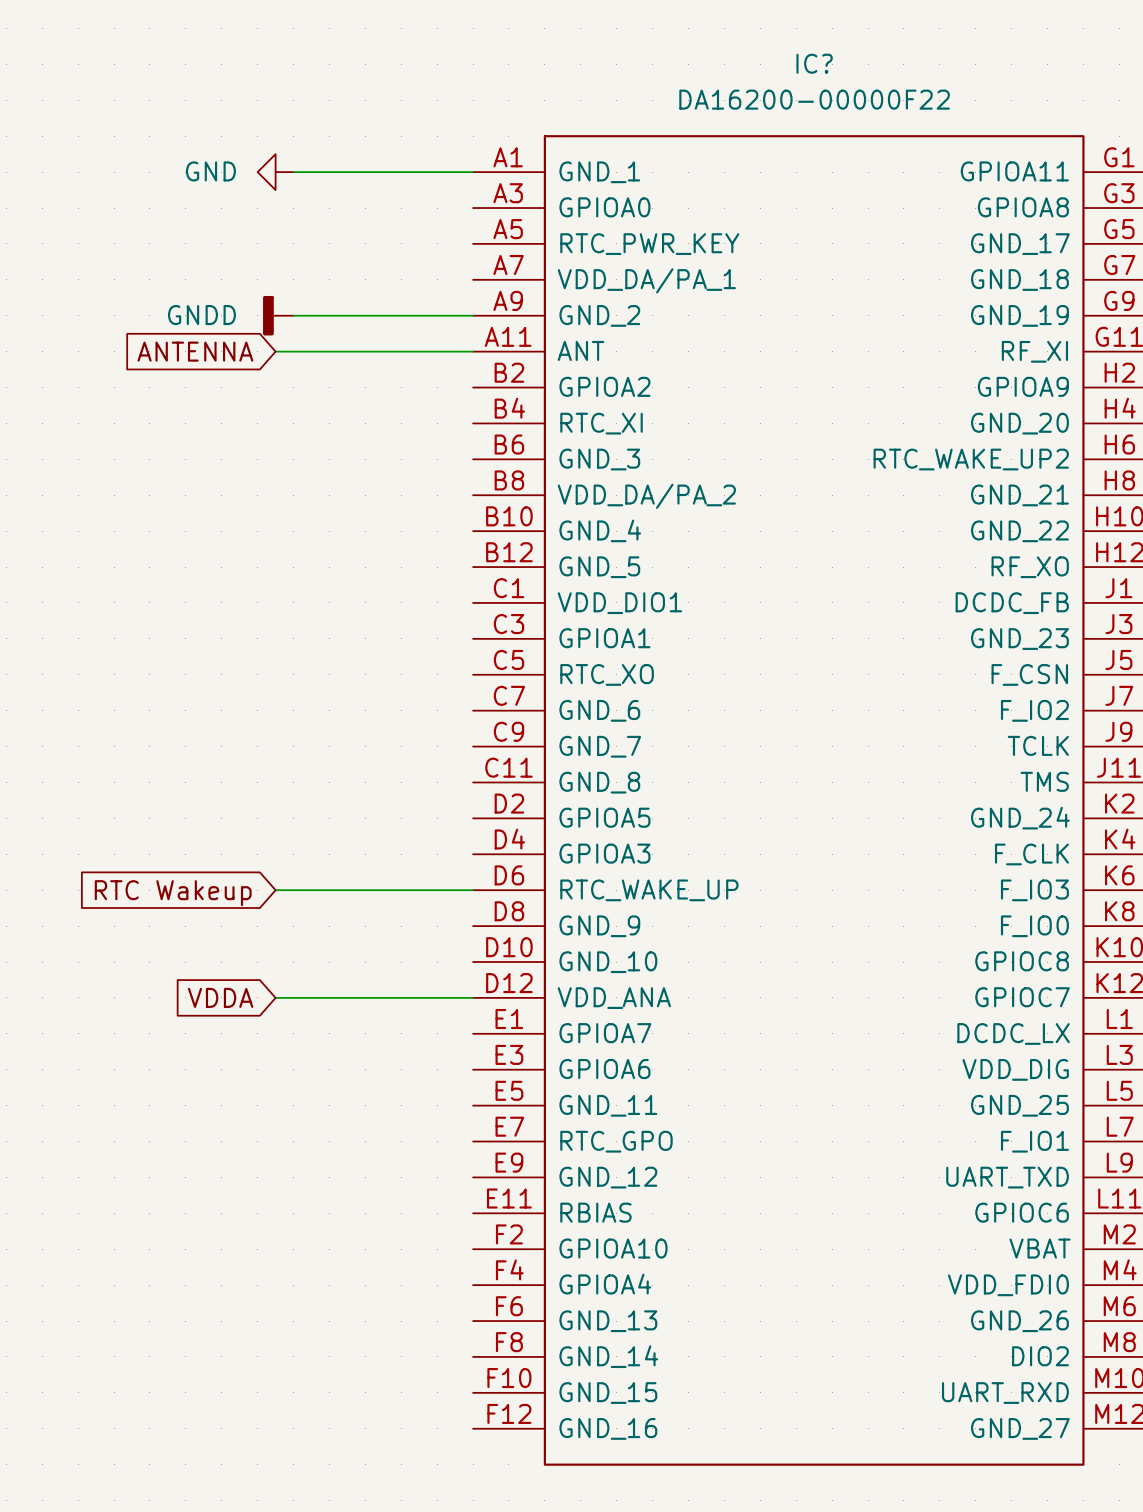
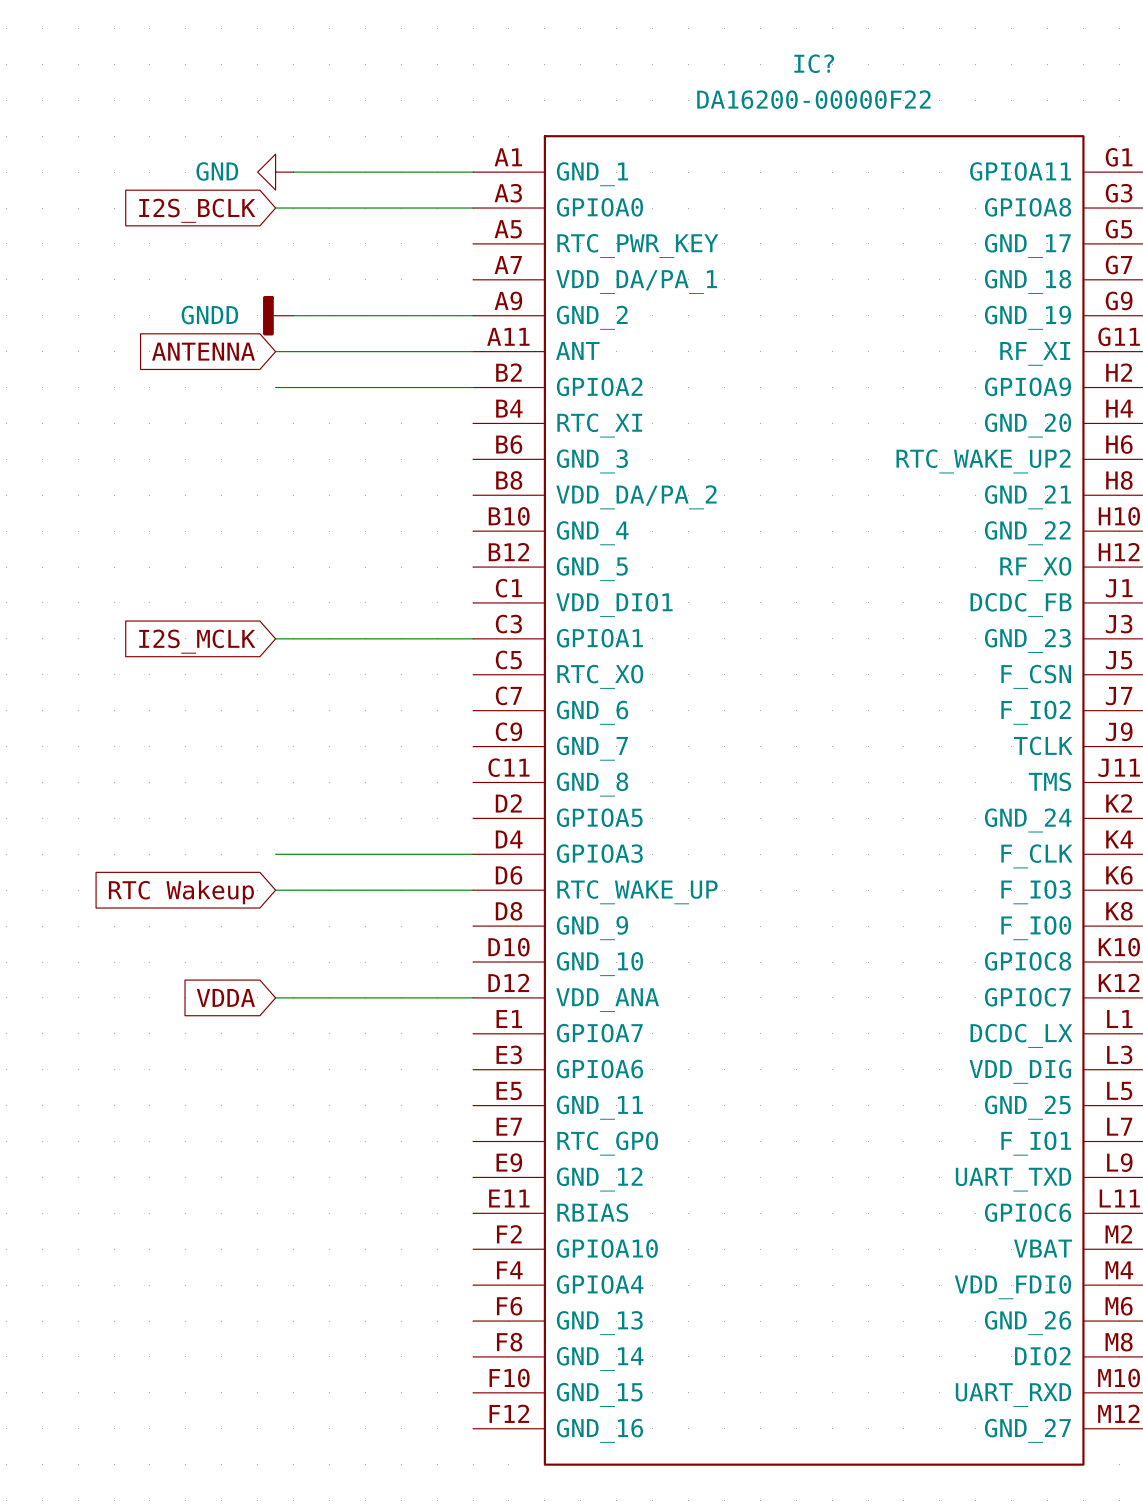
global label: none -> I2S_BCLK (197, 210)
wire: none -> (275, 208) (473, 208)
wire: none -> (275, 387) (473, 387)
wire: none -> (275, 638) (473, 638)
global label: none -> I2S_MCLK (197, 641)
wire: none -> (275, 854) (473, 854)

